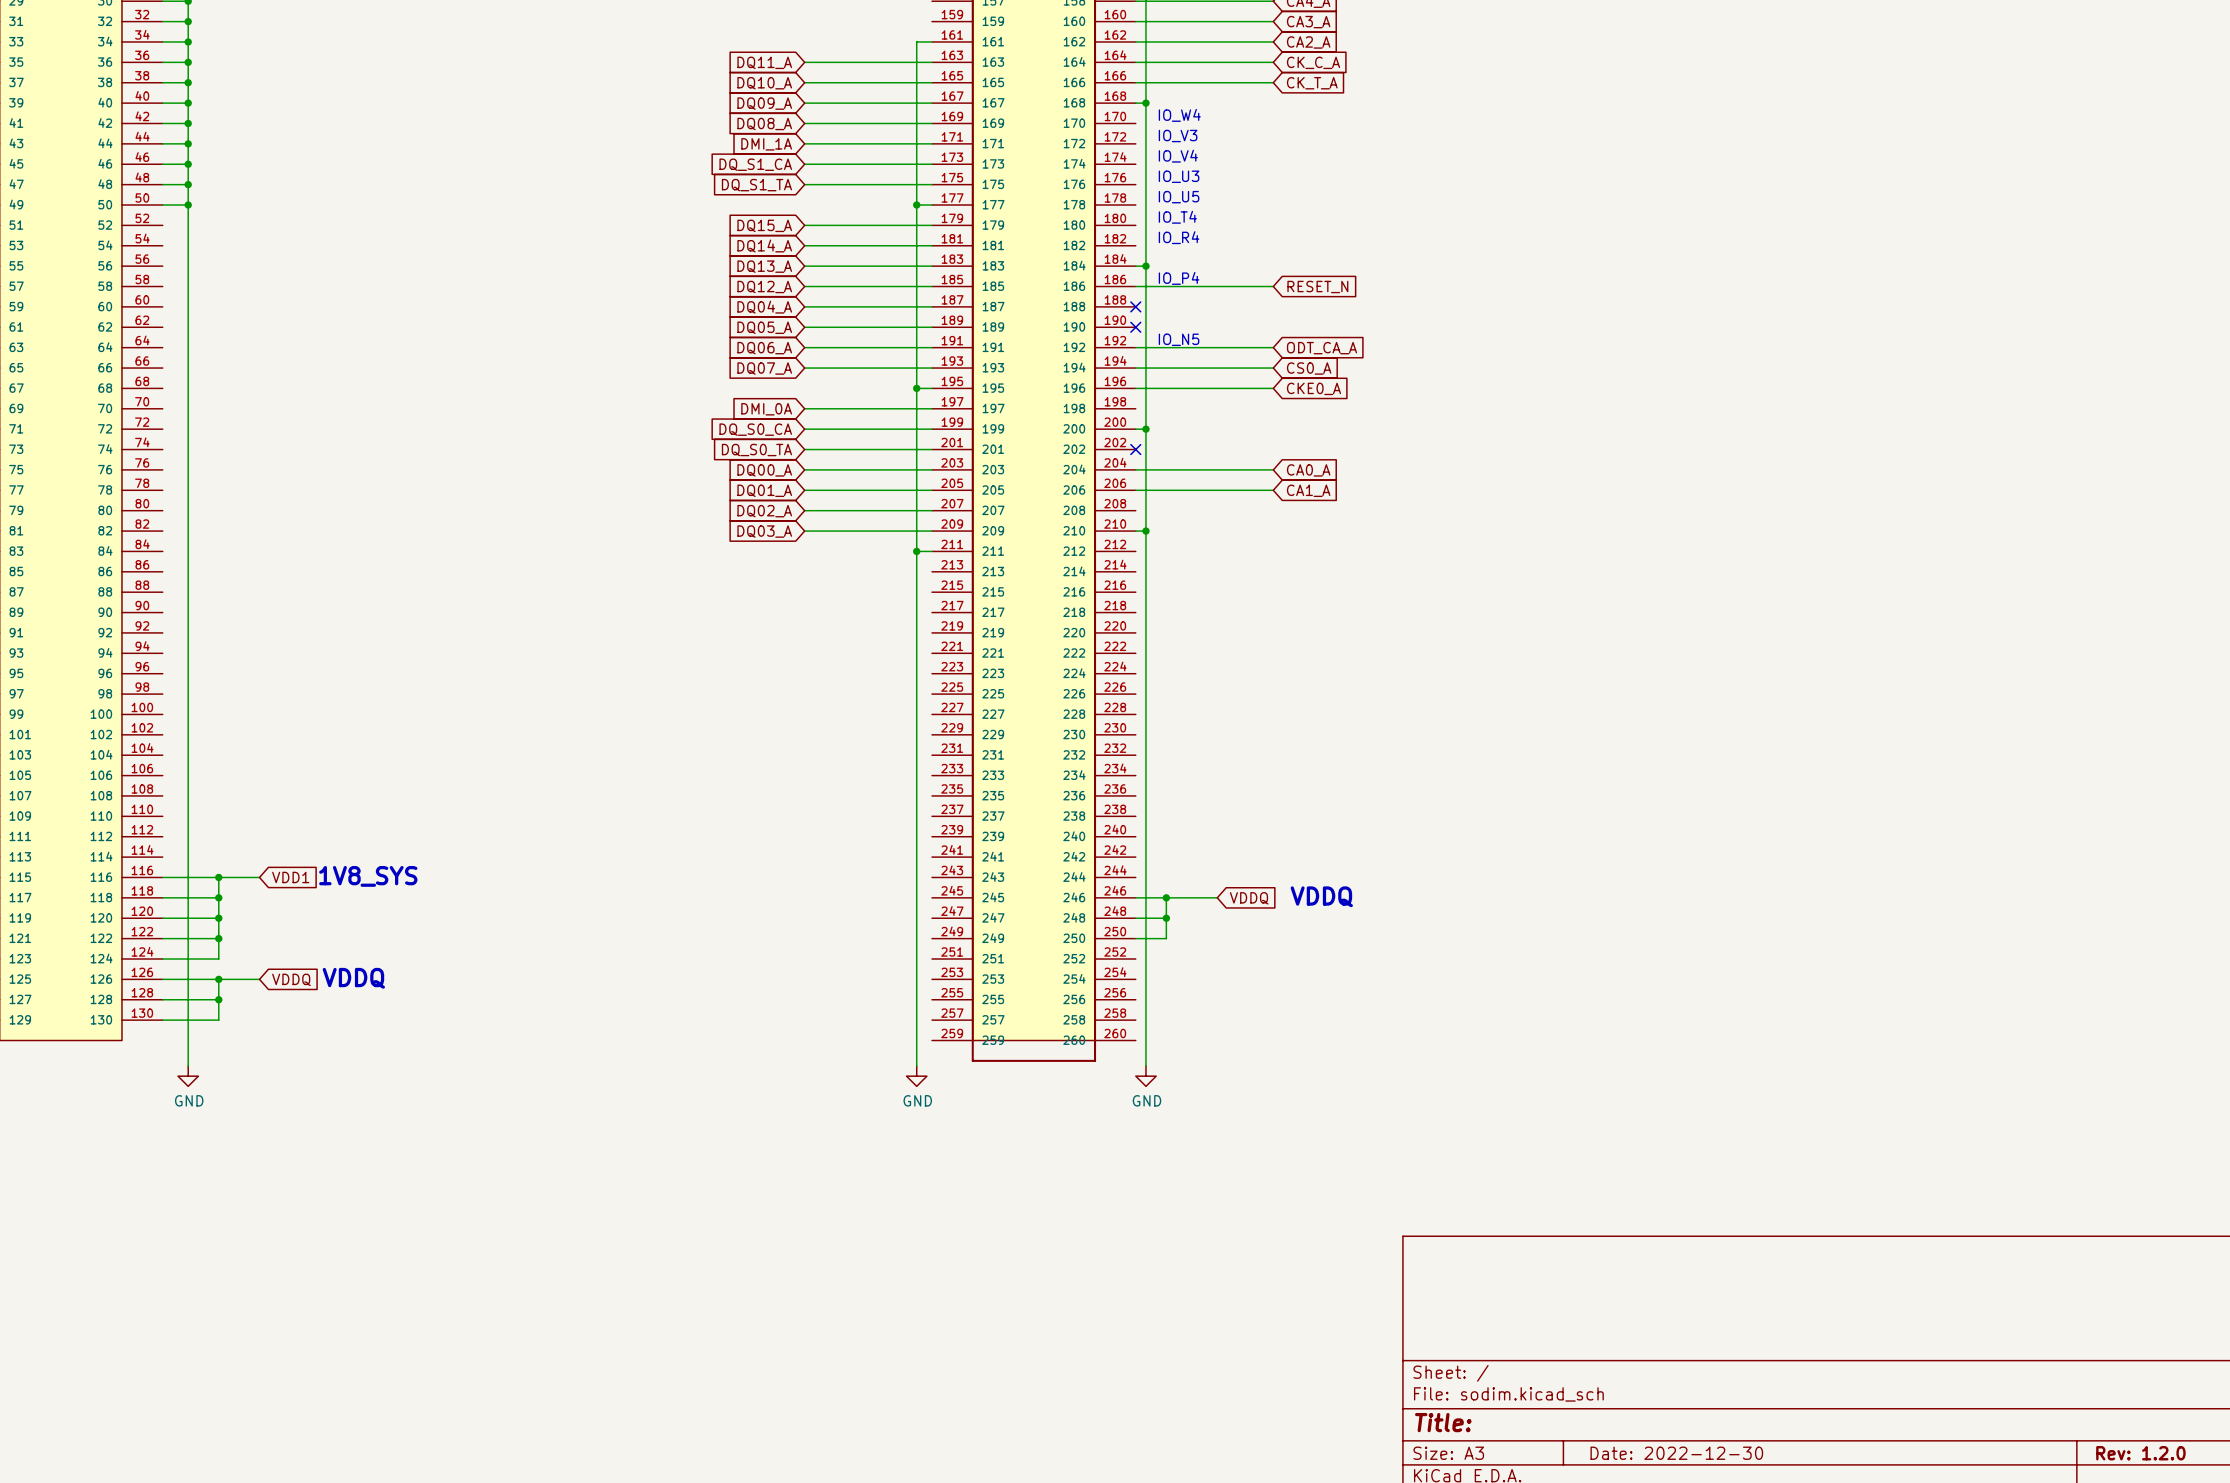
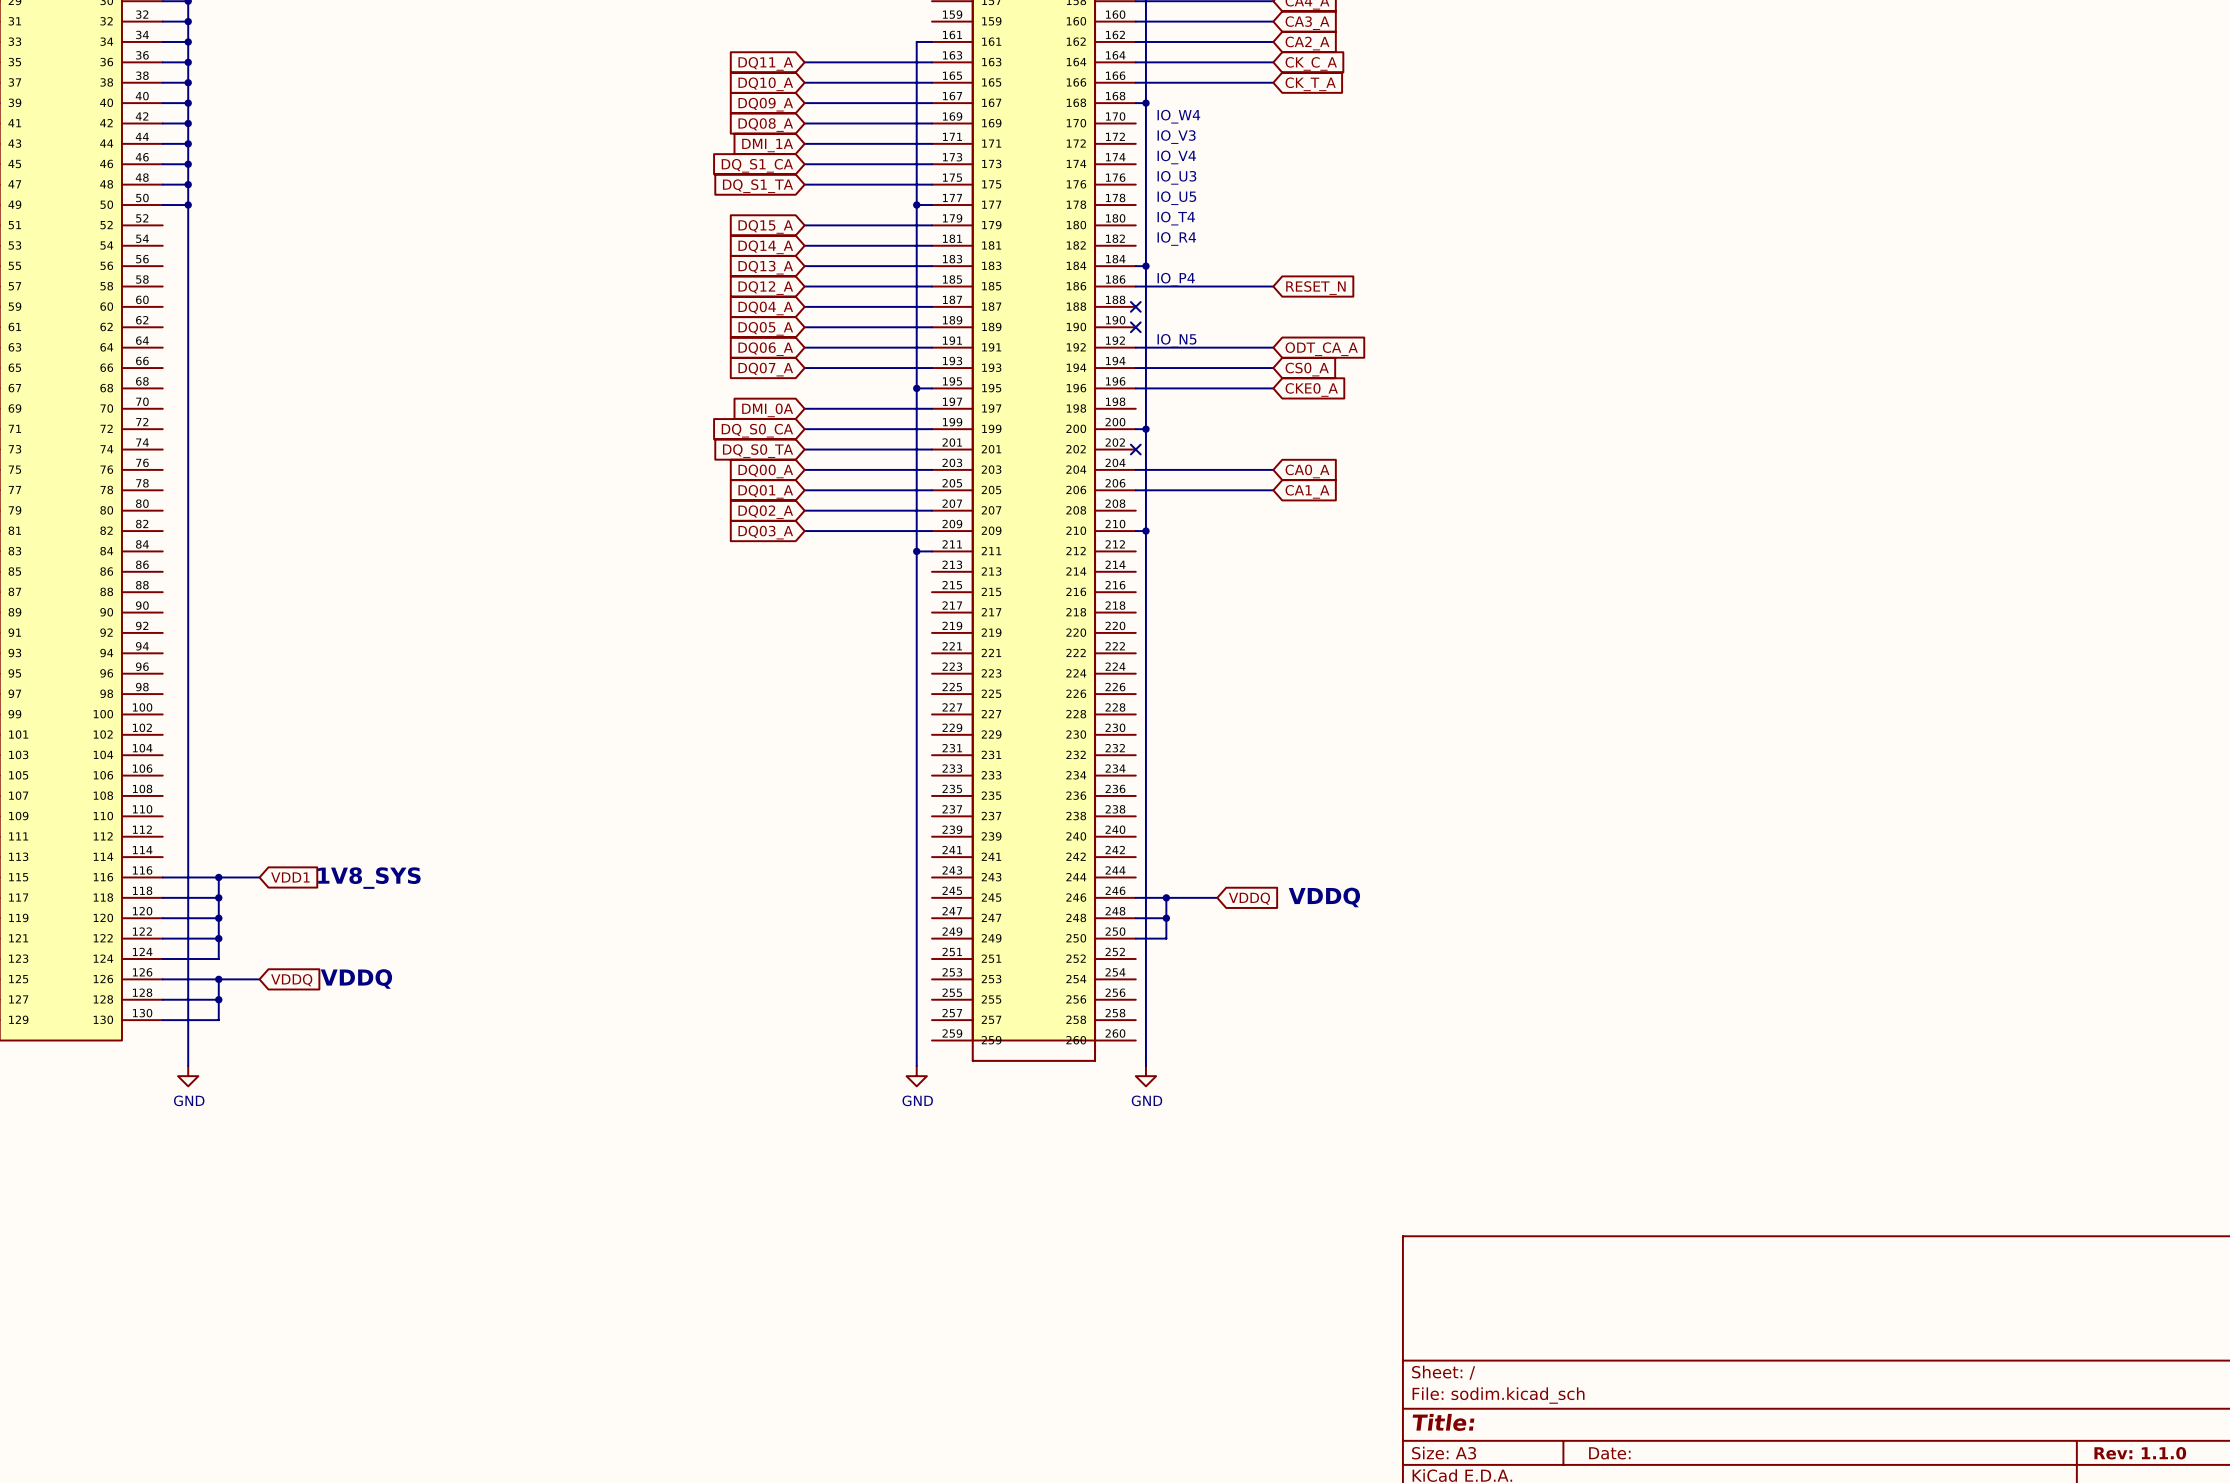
title block: Date: 2022-12-30 (1676, 1453) -> Date: (1609, 1453)
title block: Rev: 1.2.0 (2140, 1453) -> Rev: 1.1.0 (2140, 1453)

